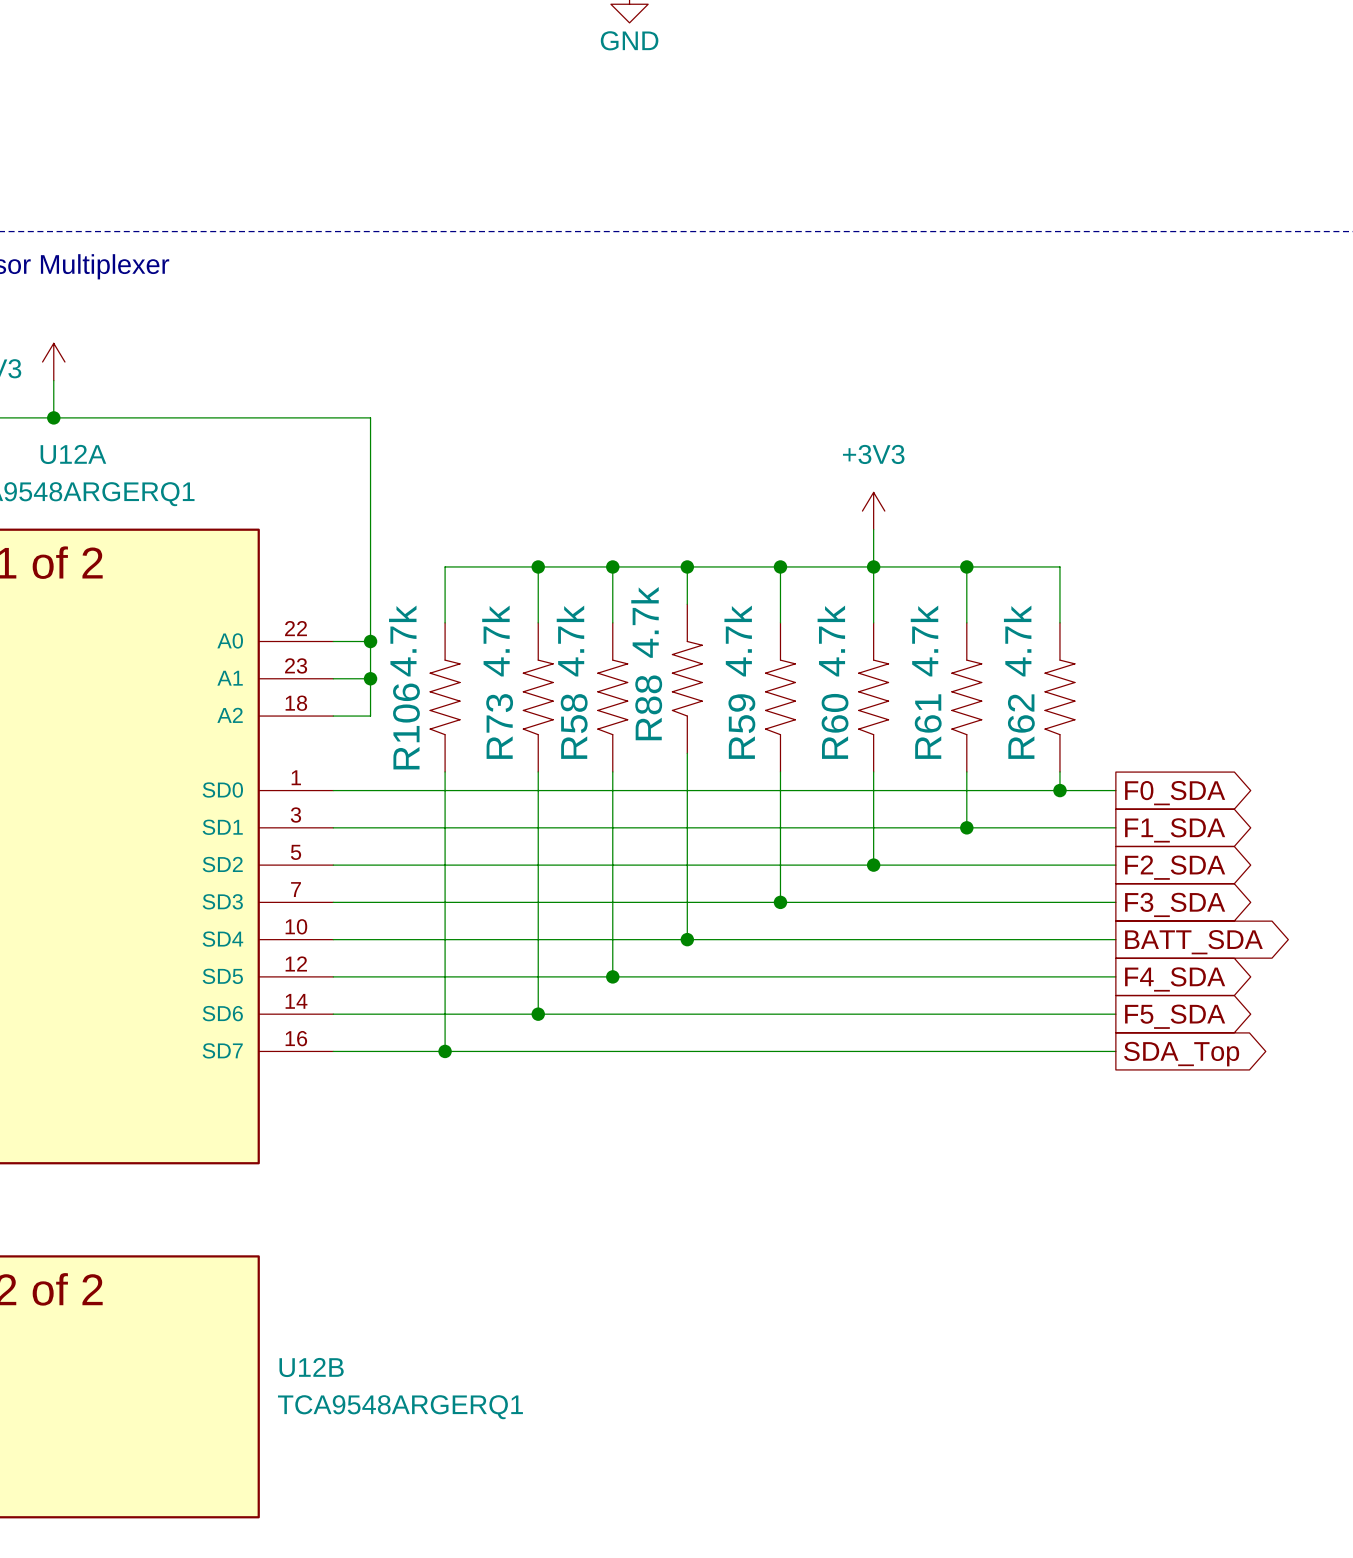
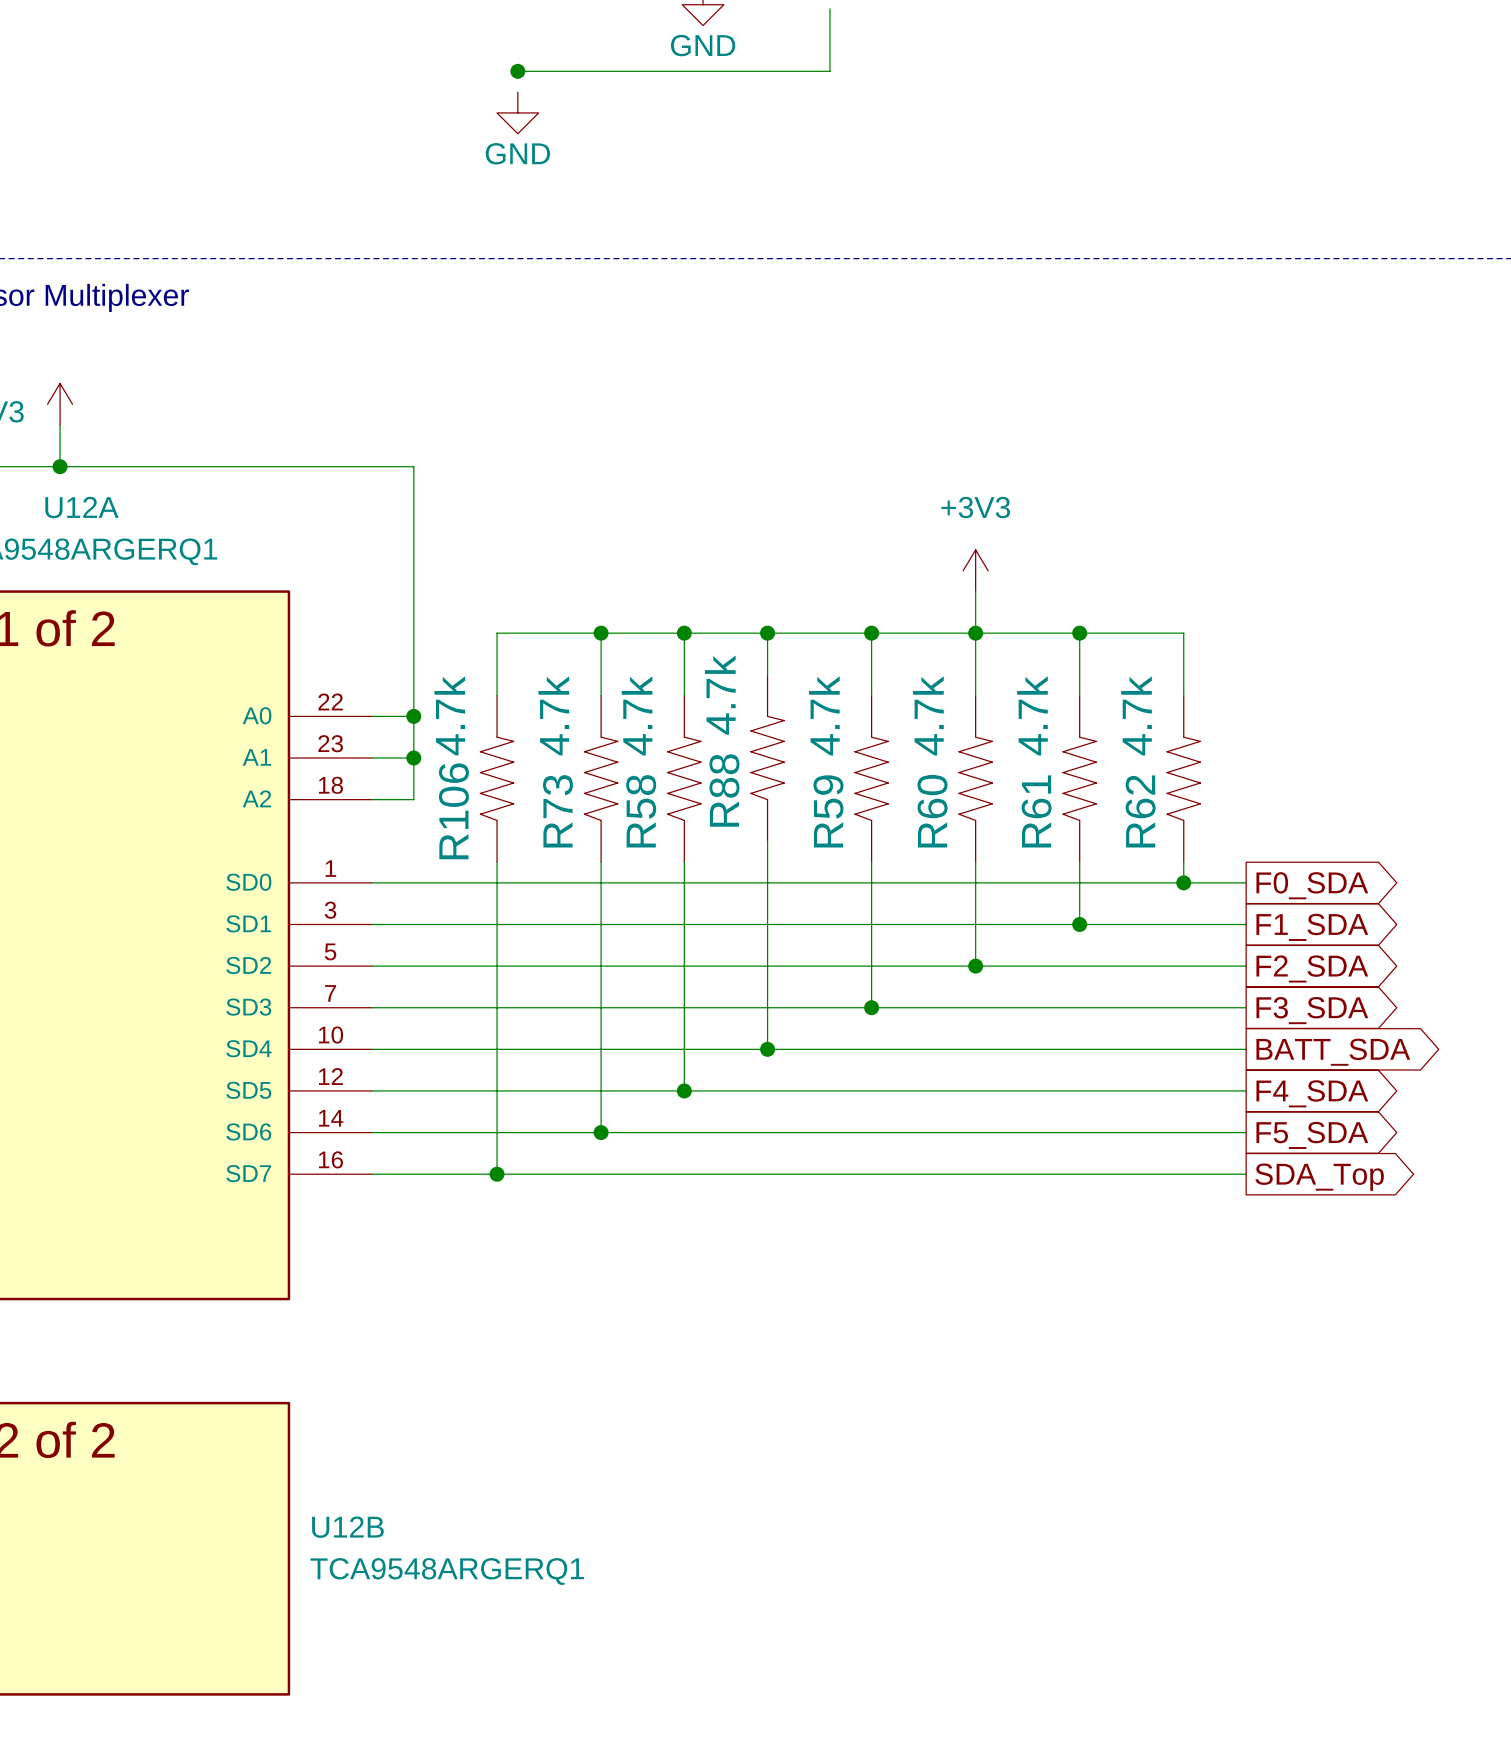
wire: none -> (829, 8) (829, 71) (517, 71)
junction: none -> (517, 71)
power symbol: none -> GND (517, 112)

